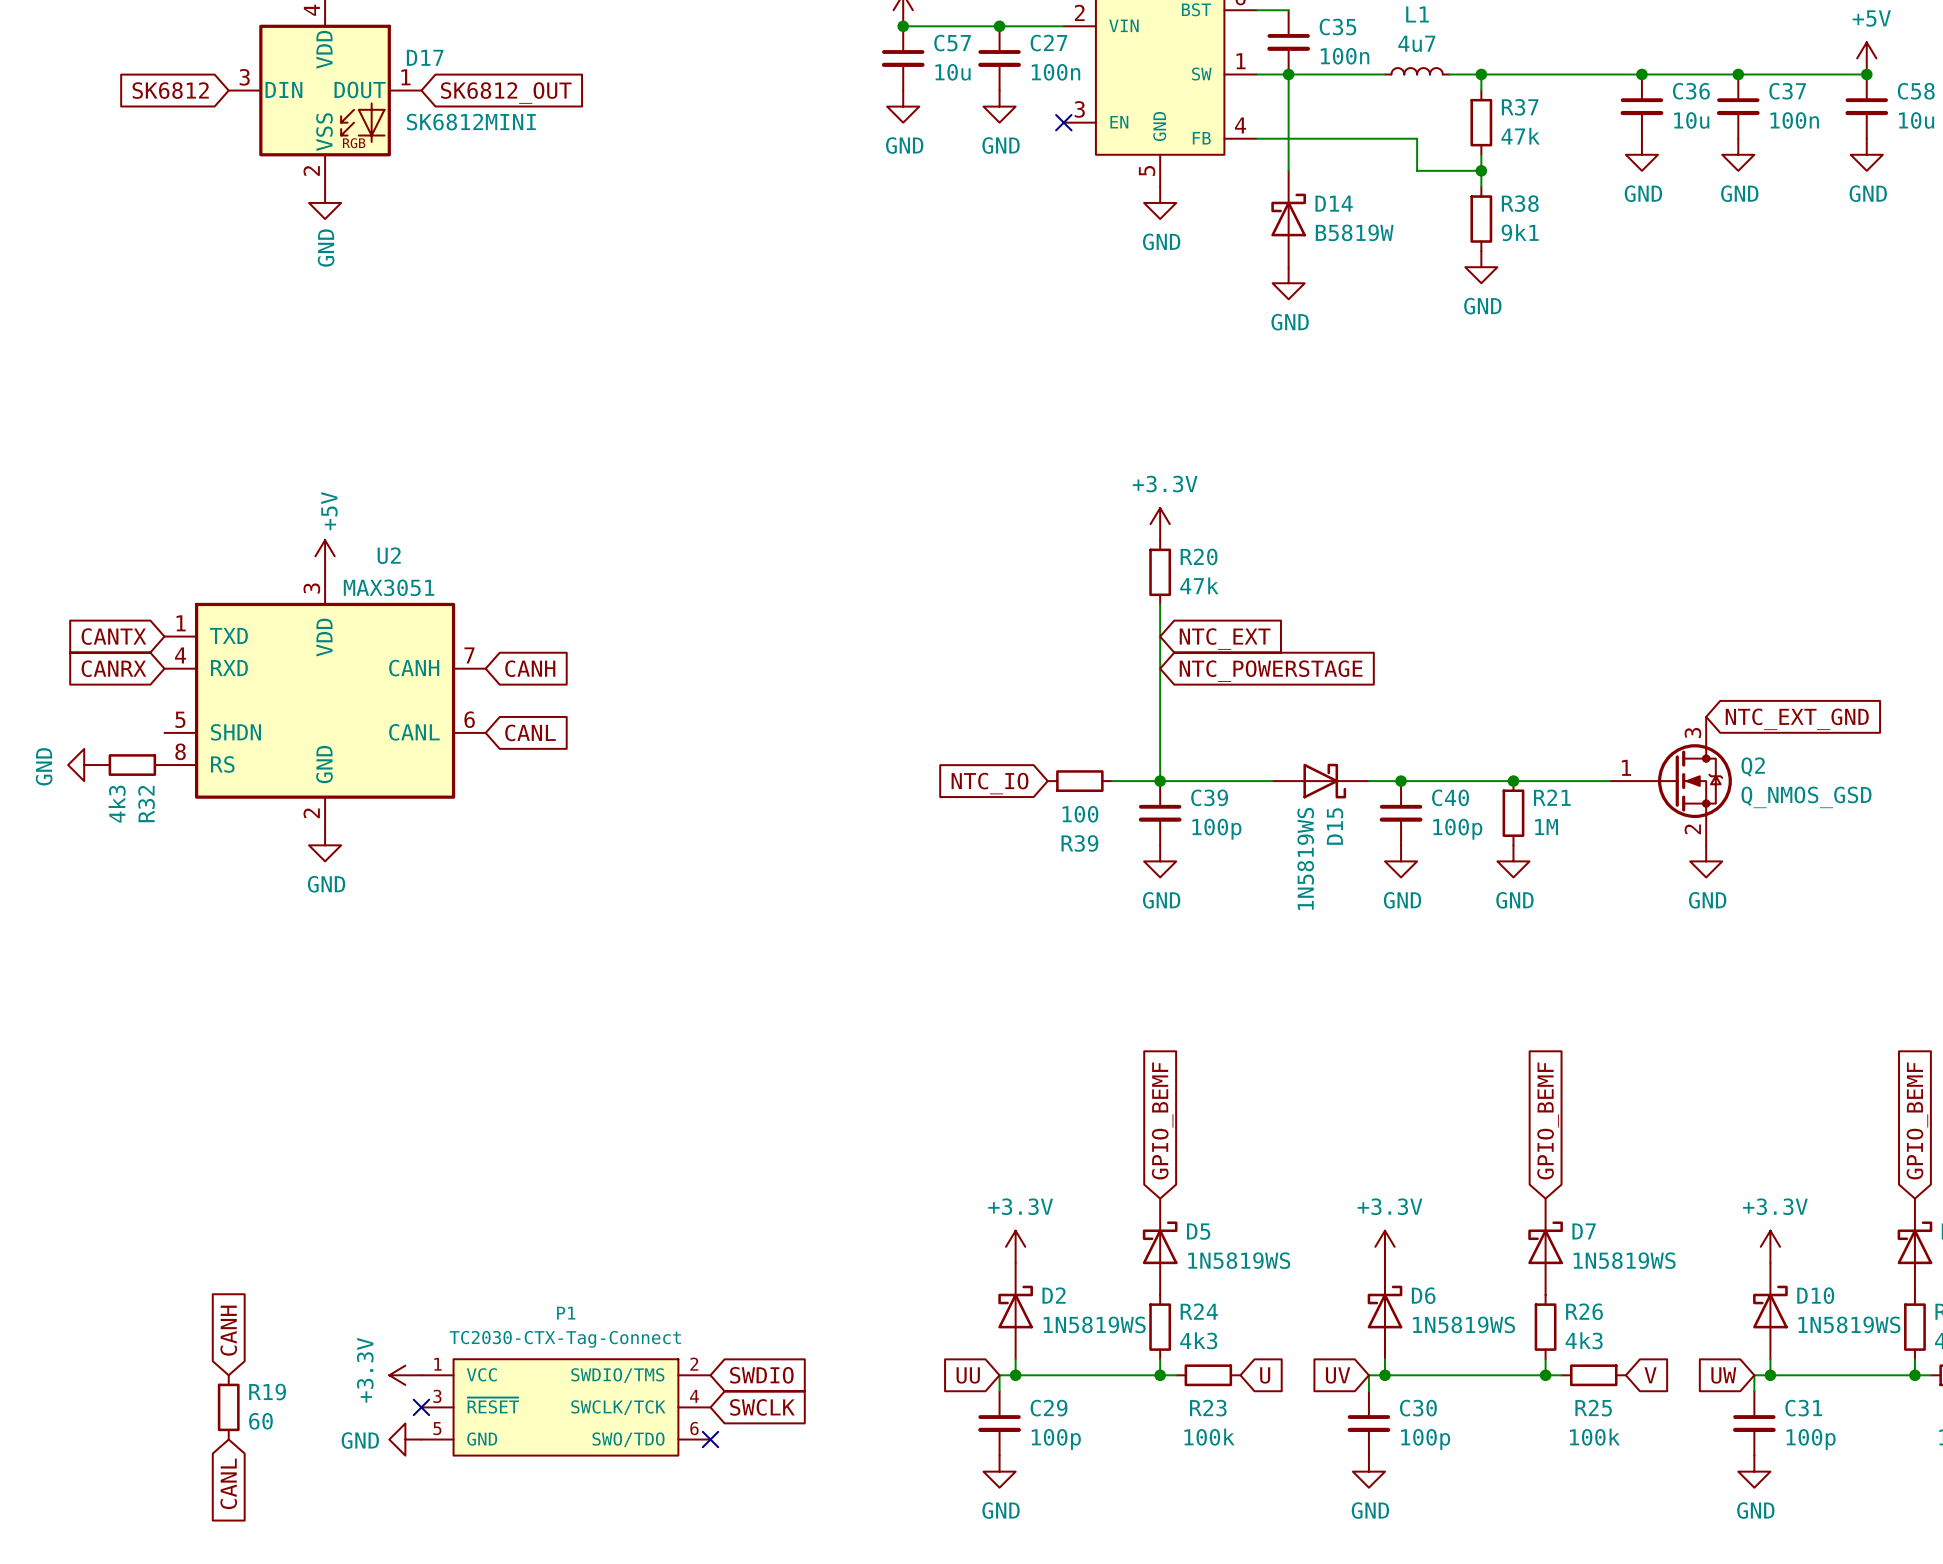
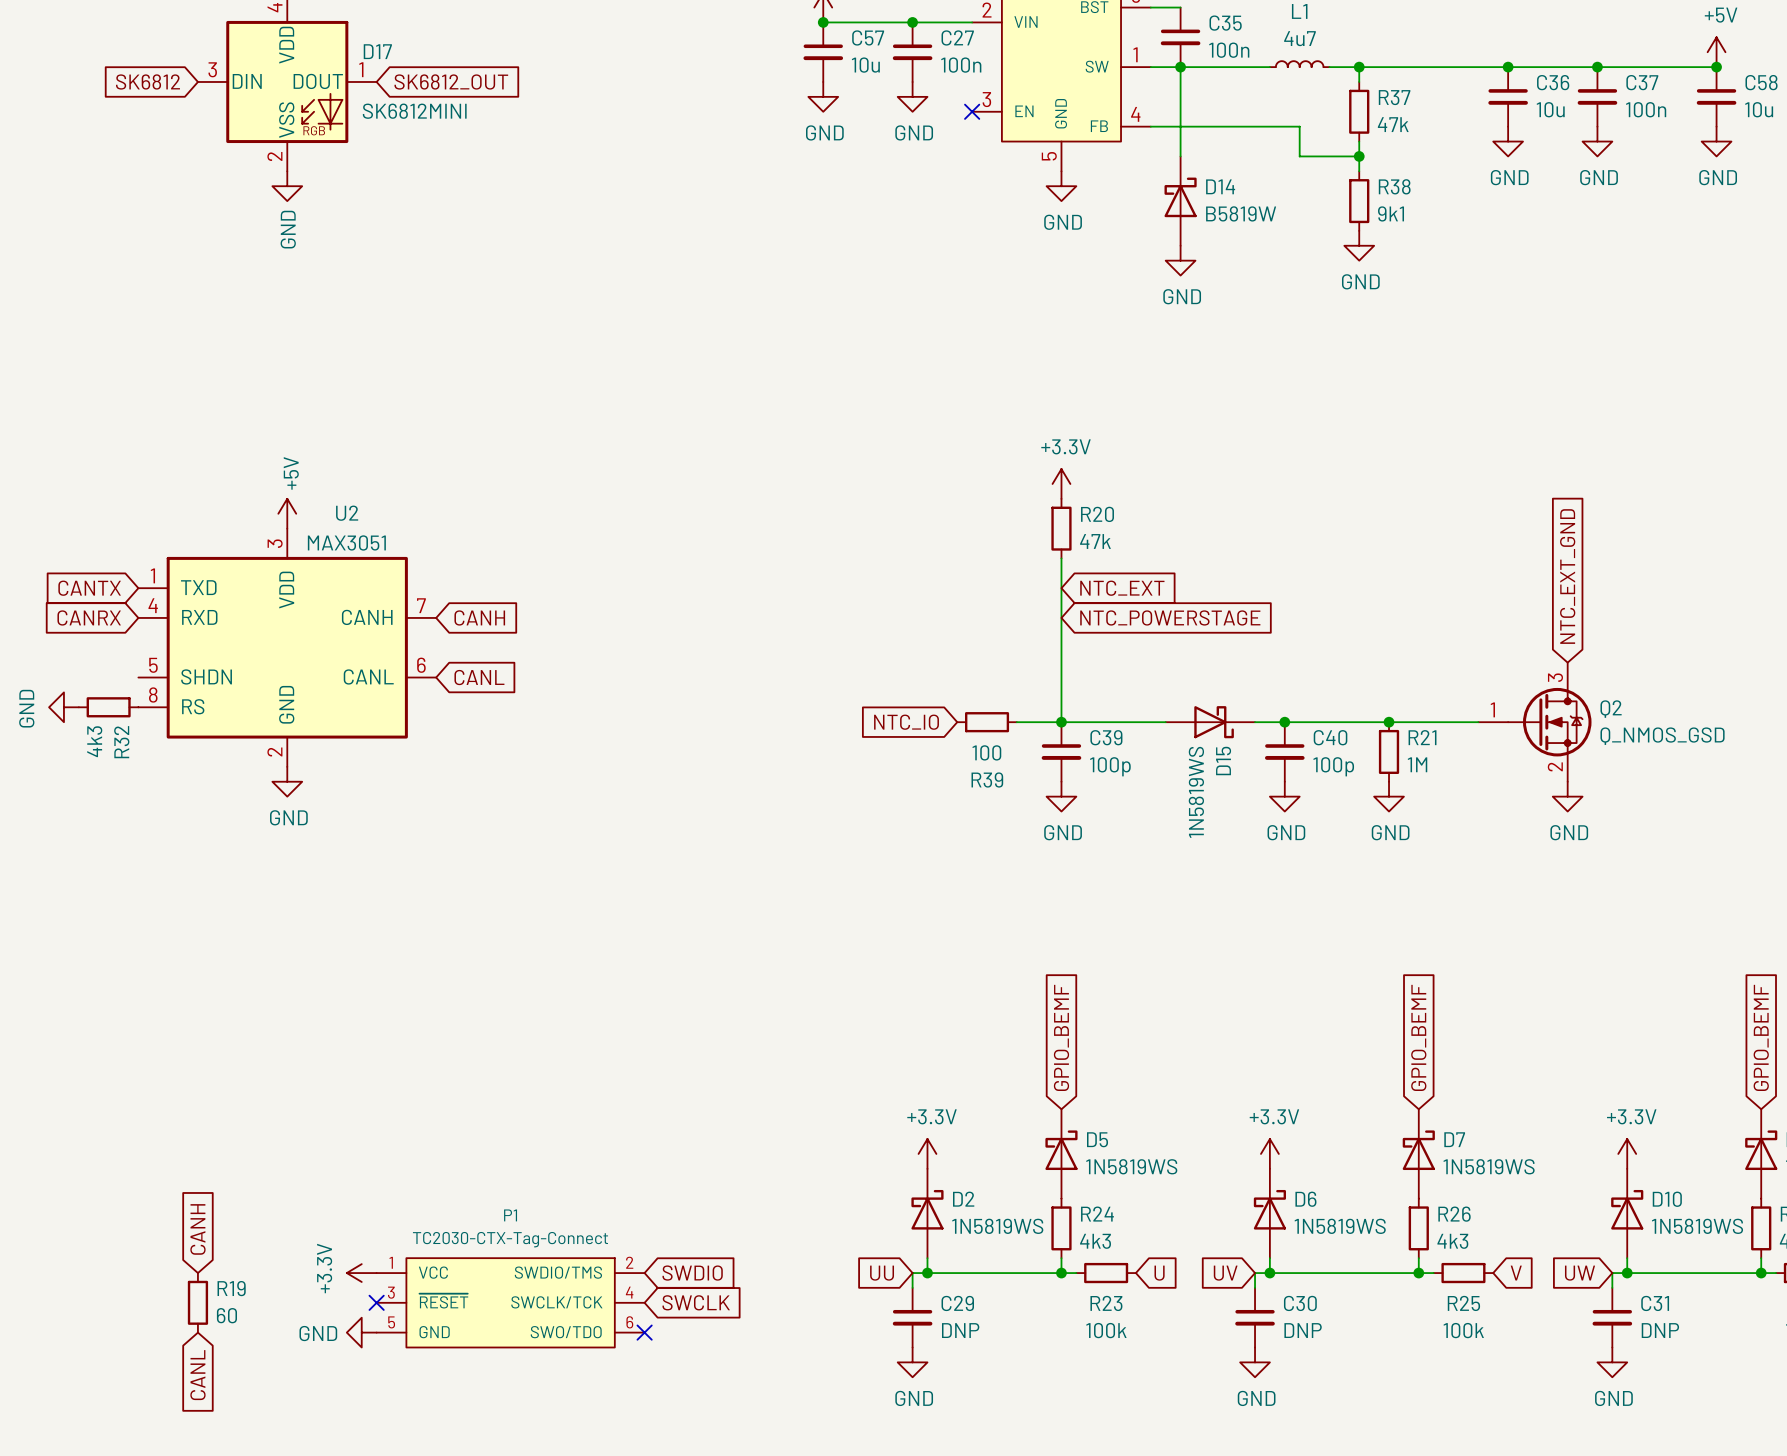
global label rotation: 0° (1797, 719) -> 90° counterclockwise (1567, 576)
C29 value: 100p (1056, 1439) -> DNP (960, 1330)
C30 value: 100p (1425, 1439) -> DNP (1303, 1330)
C31 value: 100p (1811, 1439) -> DNP (1660, 1330)

